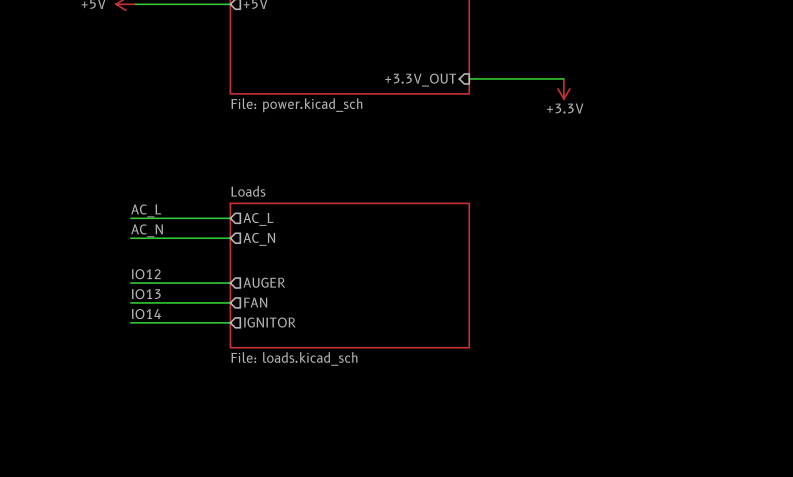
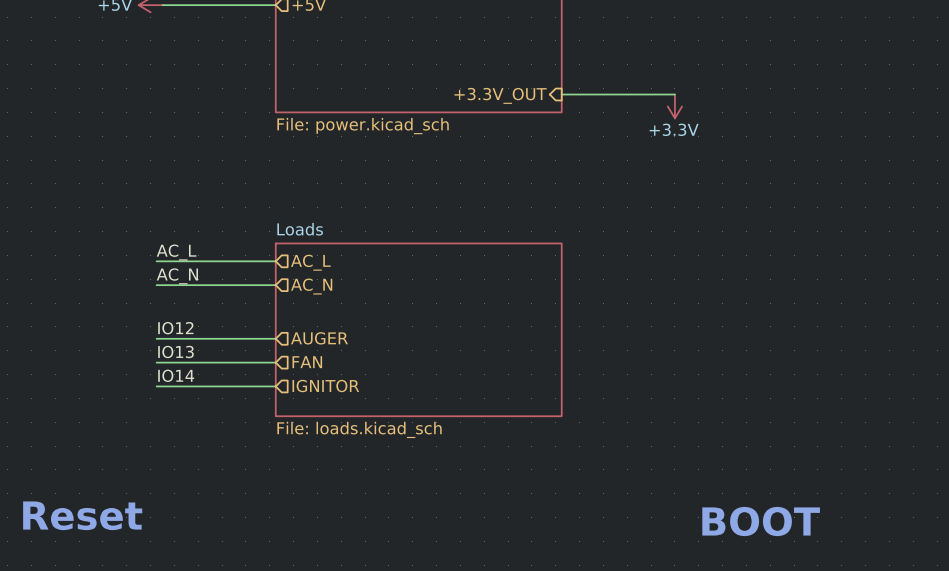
text: none -> Reset (82, 515)
text: none -> BOOT (761, 521)

